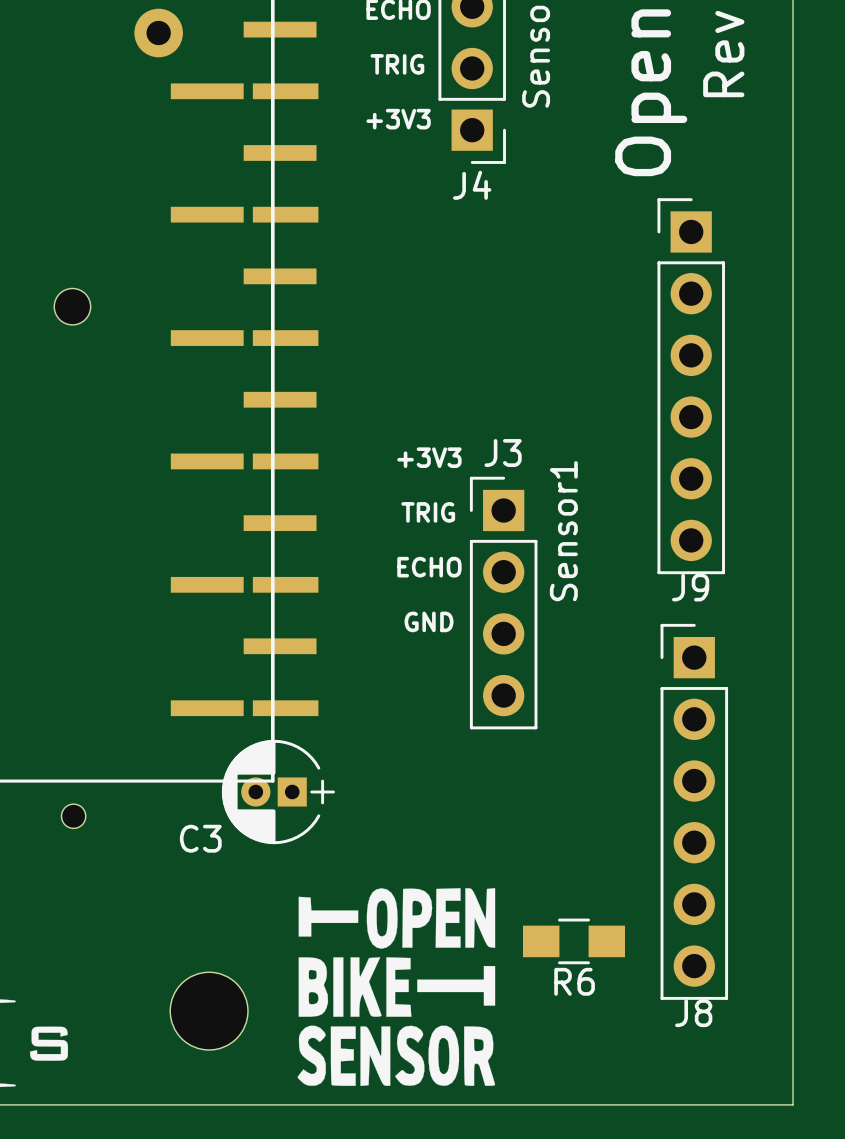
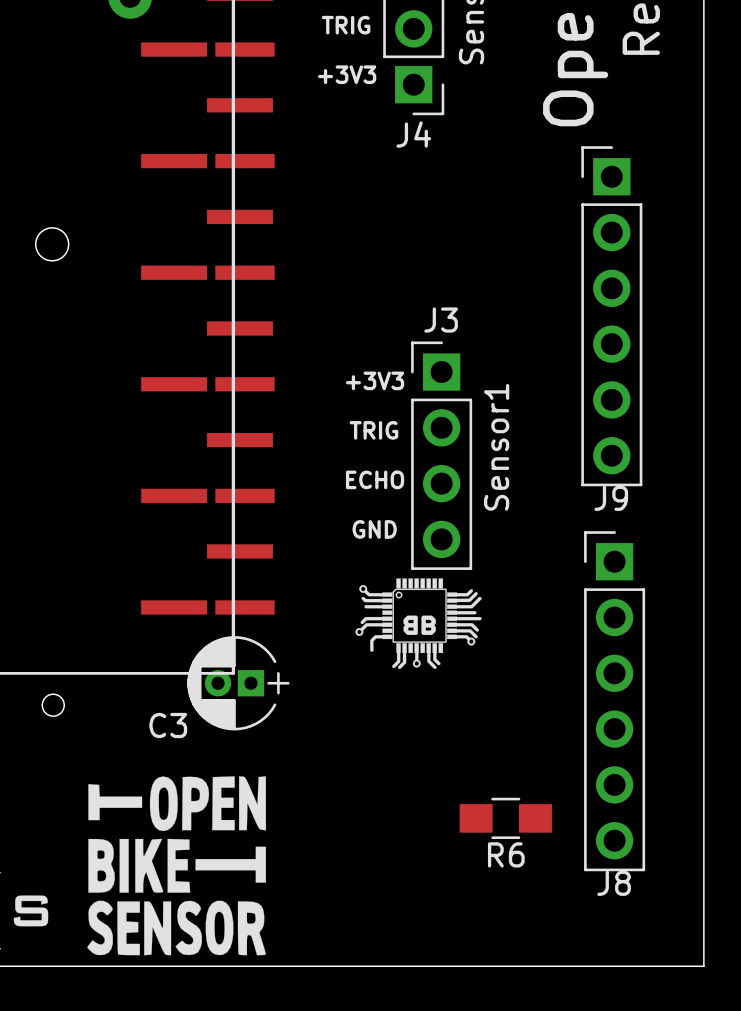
J3 position: (503, 603) -> (441, 455)
drawing: none -> [355, 578, 482, 670]
drawing position: (396, 987) -> (176, 865)
part: (209, 1011) -> none

